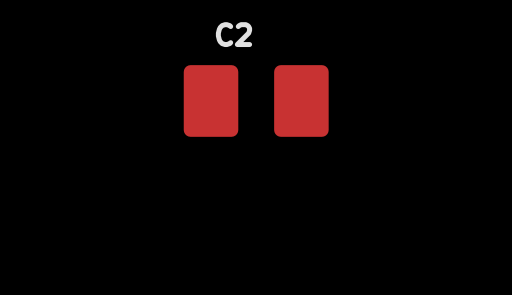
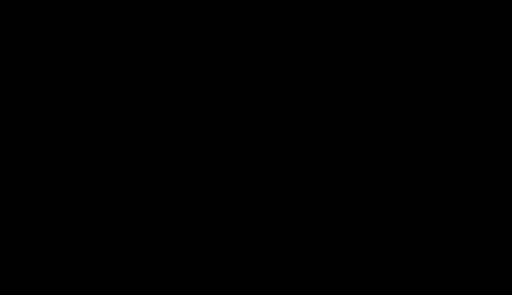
C2: (256, 100) -> none

